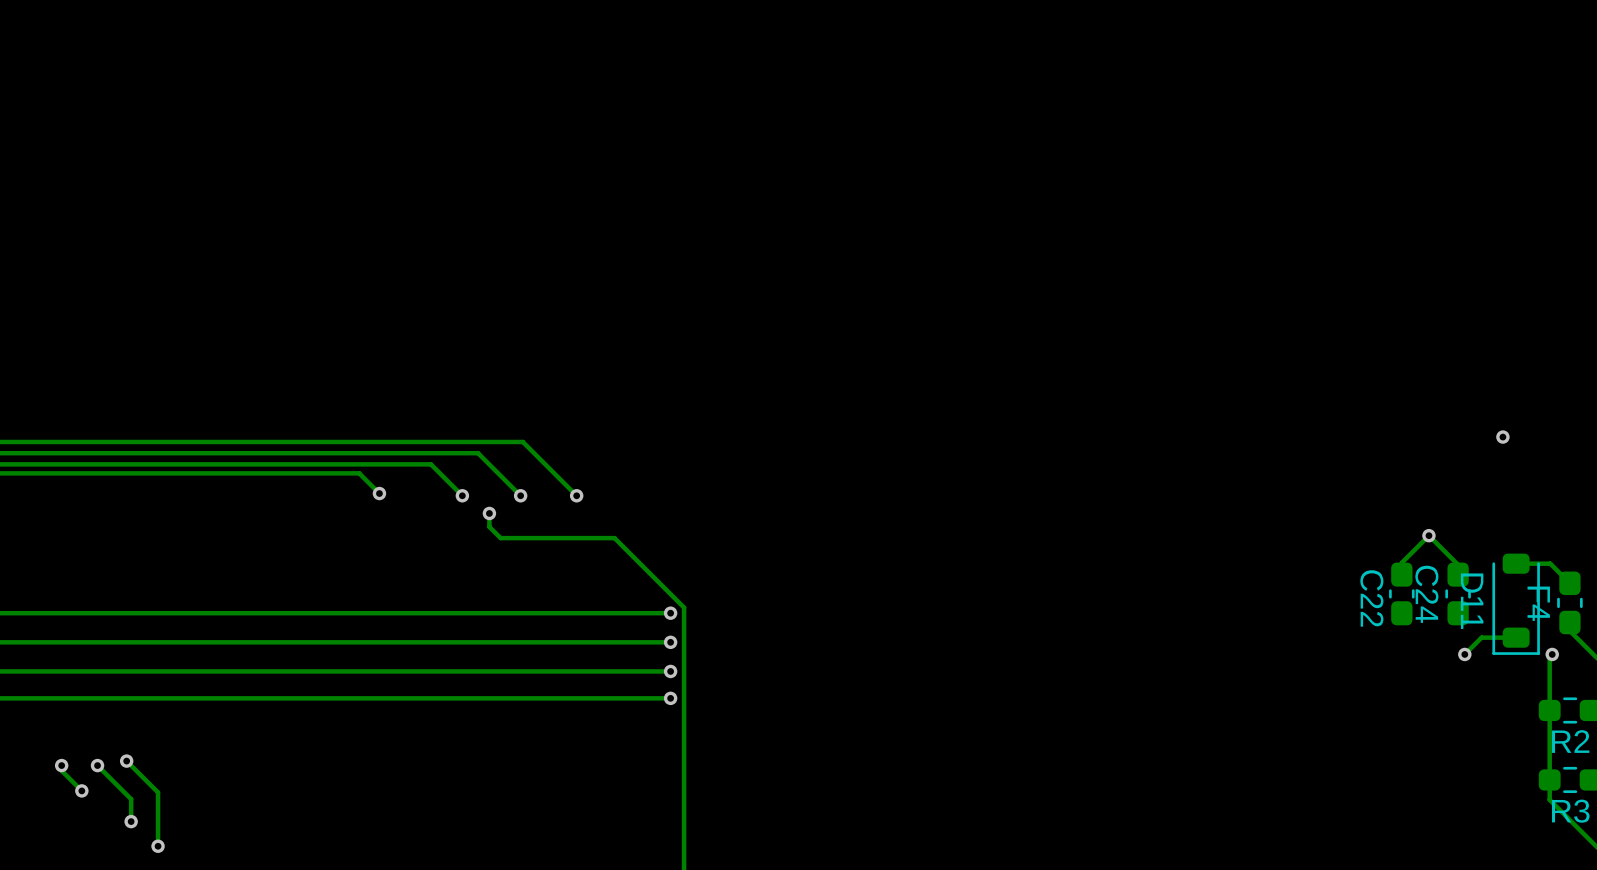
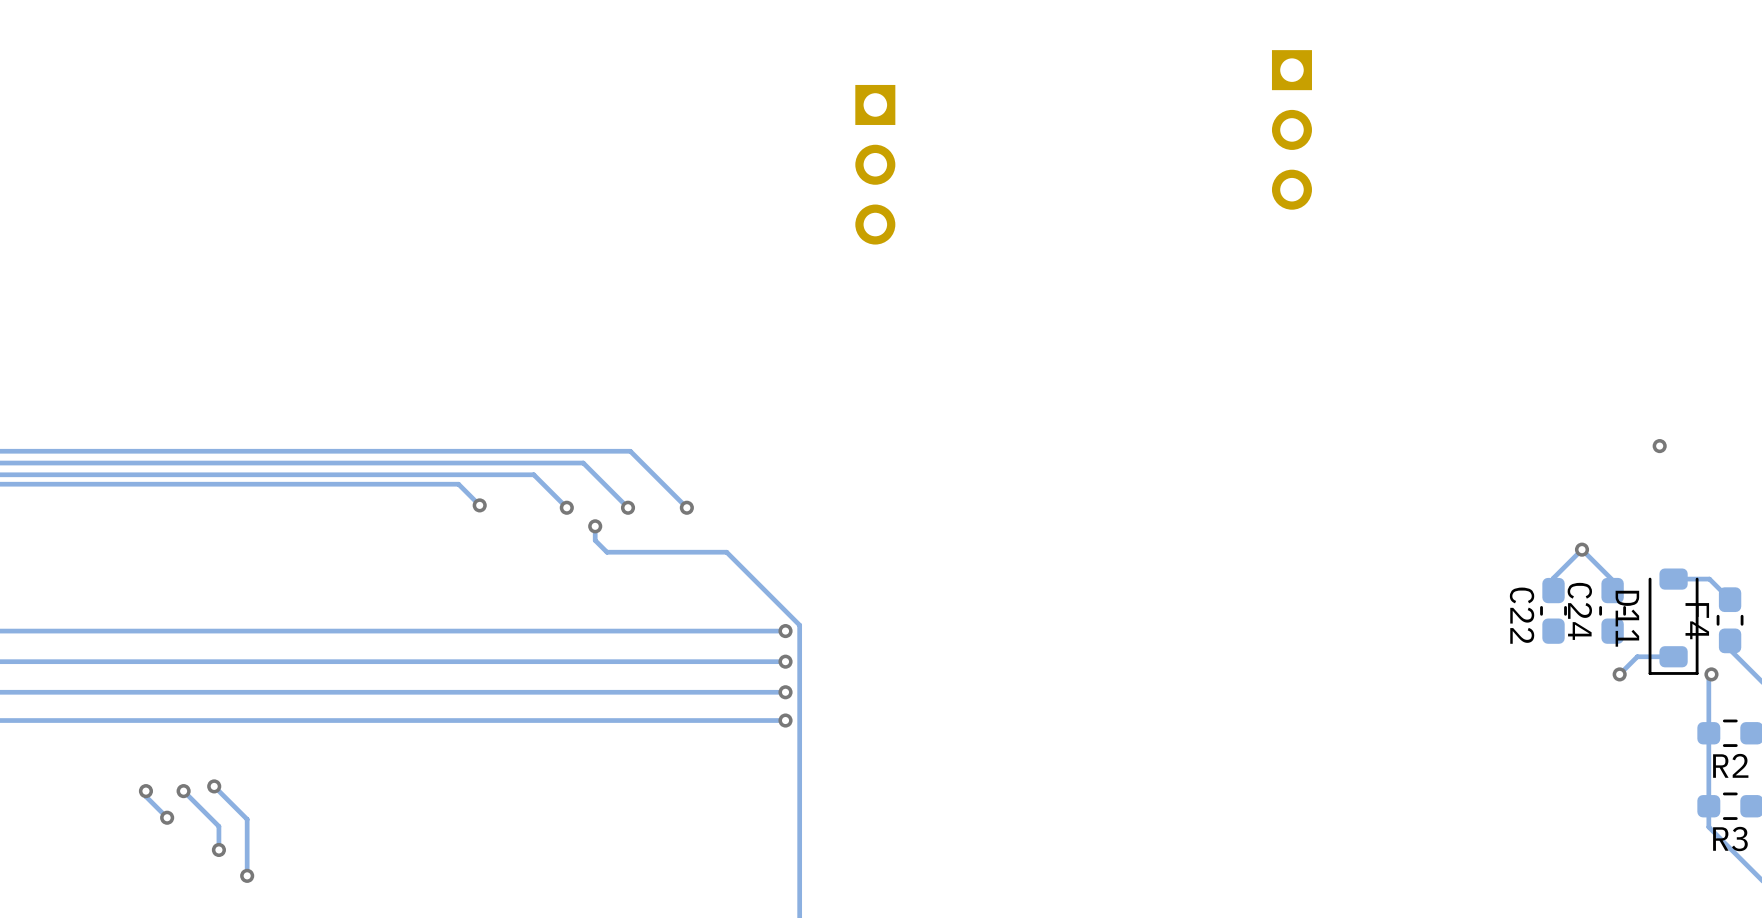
part: none -> (1291, 129)
part: none -> (875, 164)

